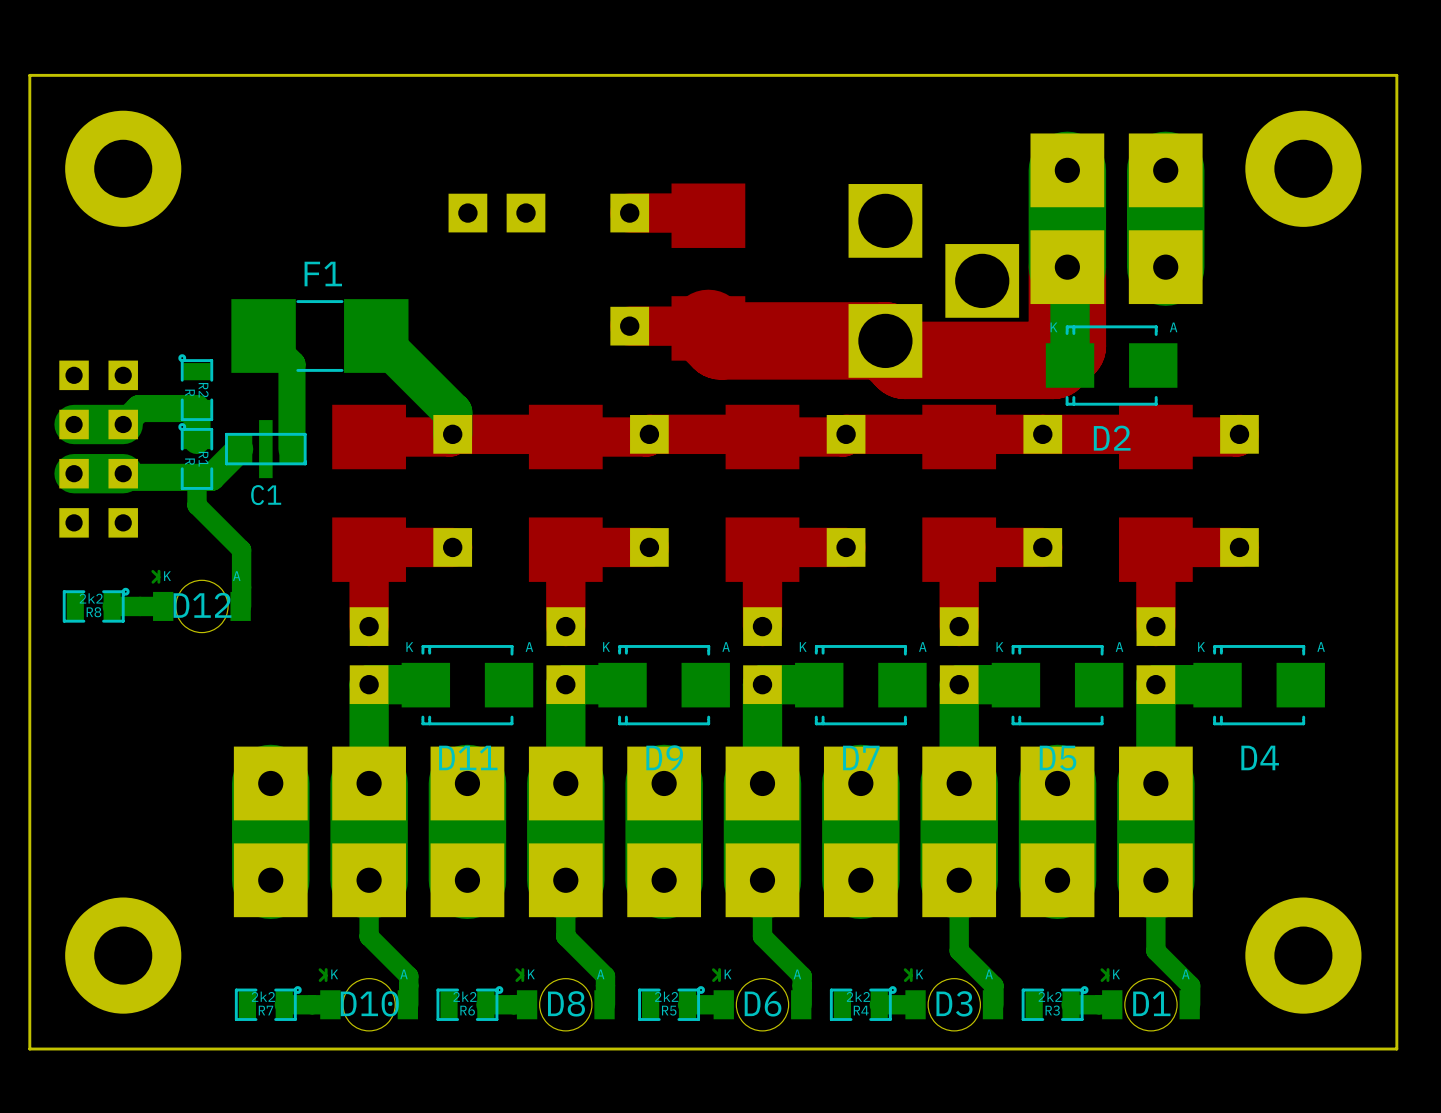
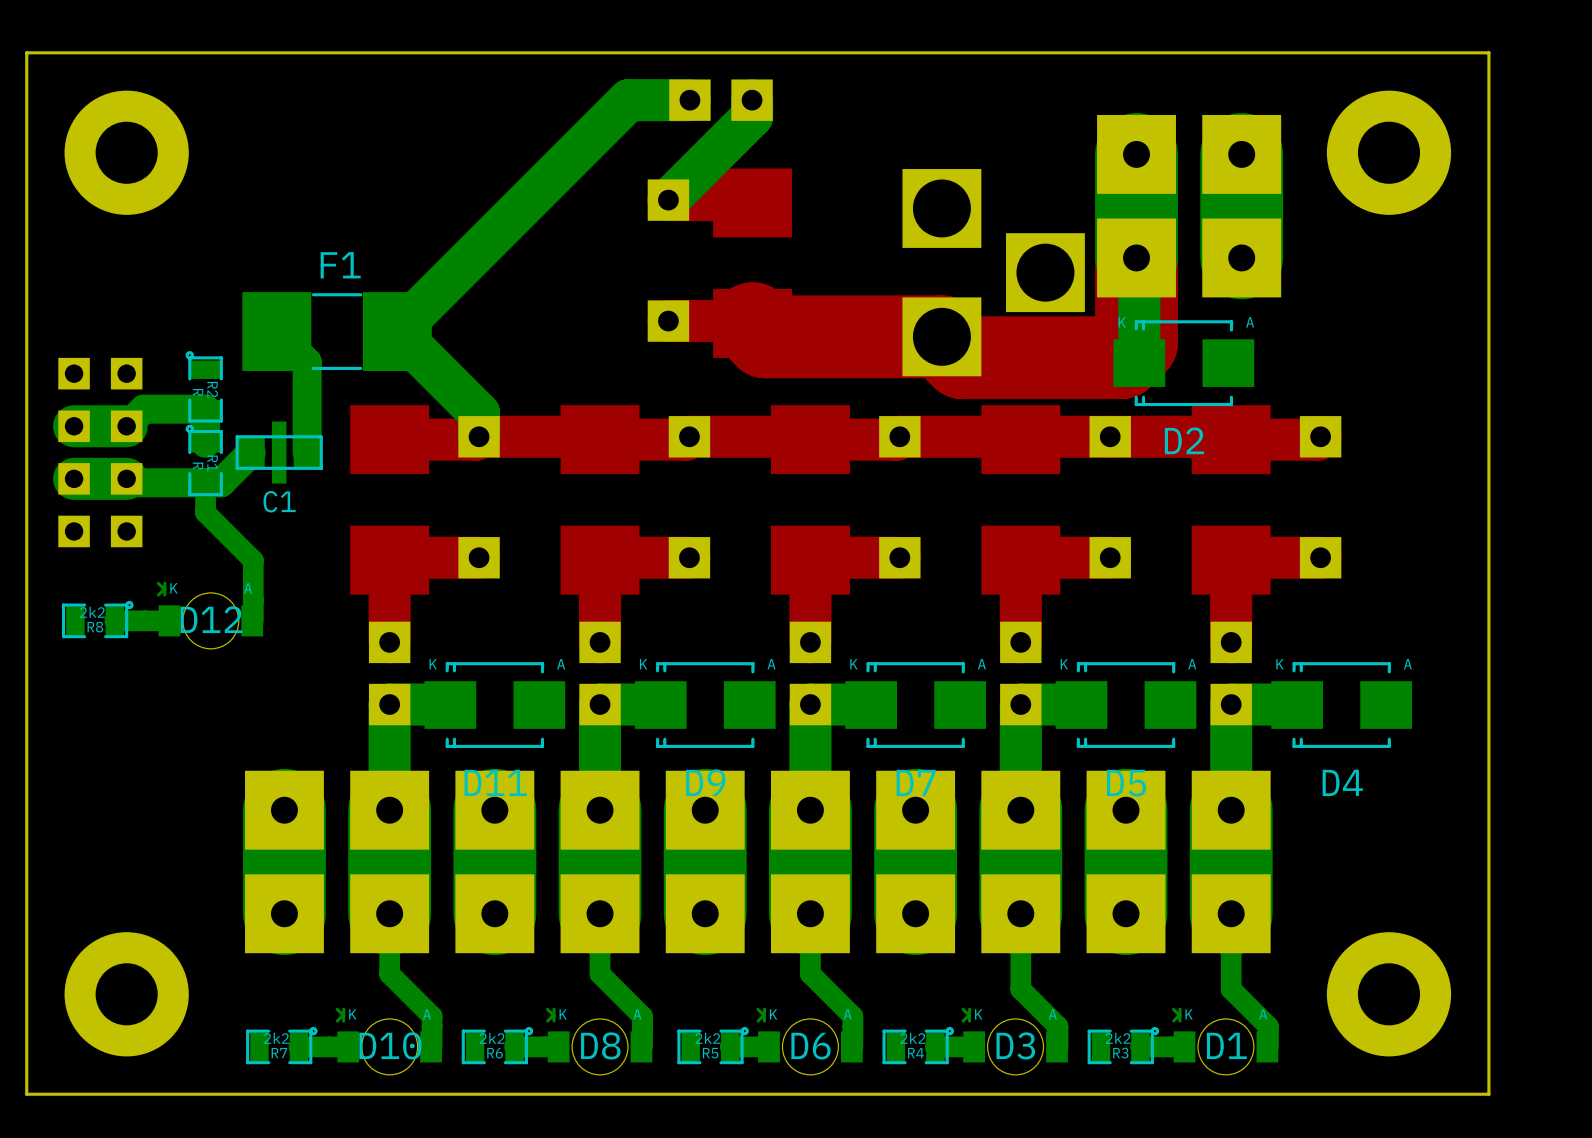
bottom track: none -> (689, 100) (628, 100) (397, 331)
bottom track: none -> (752, 100) (752, 116) (668, 200)
part position: (496, 213) -> (721, 100)

